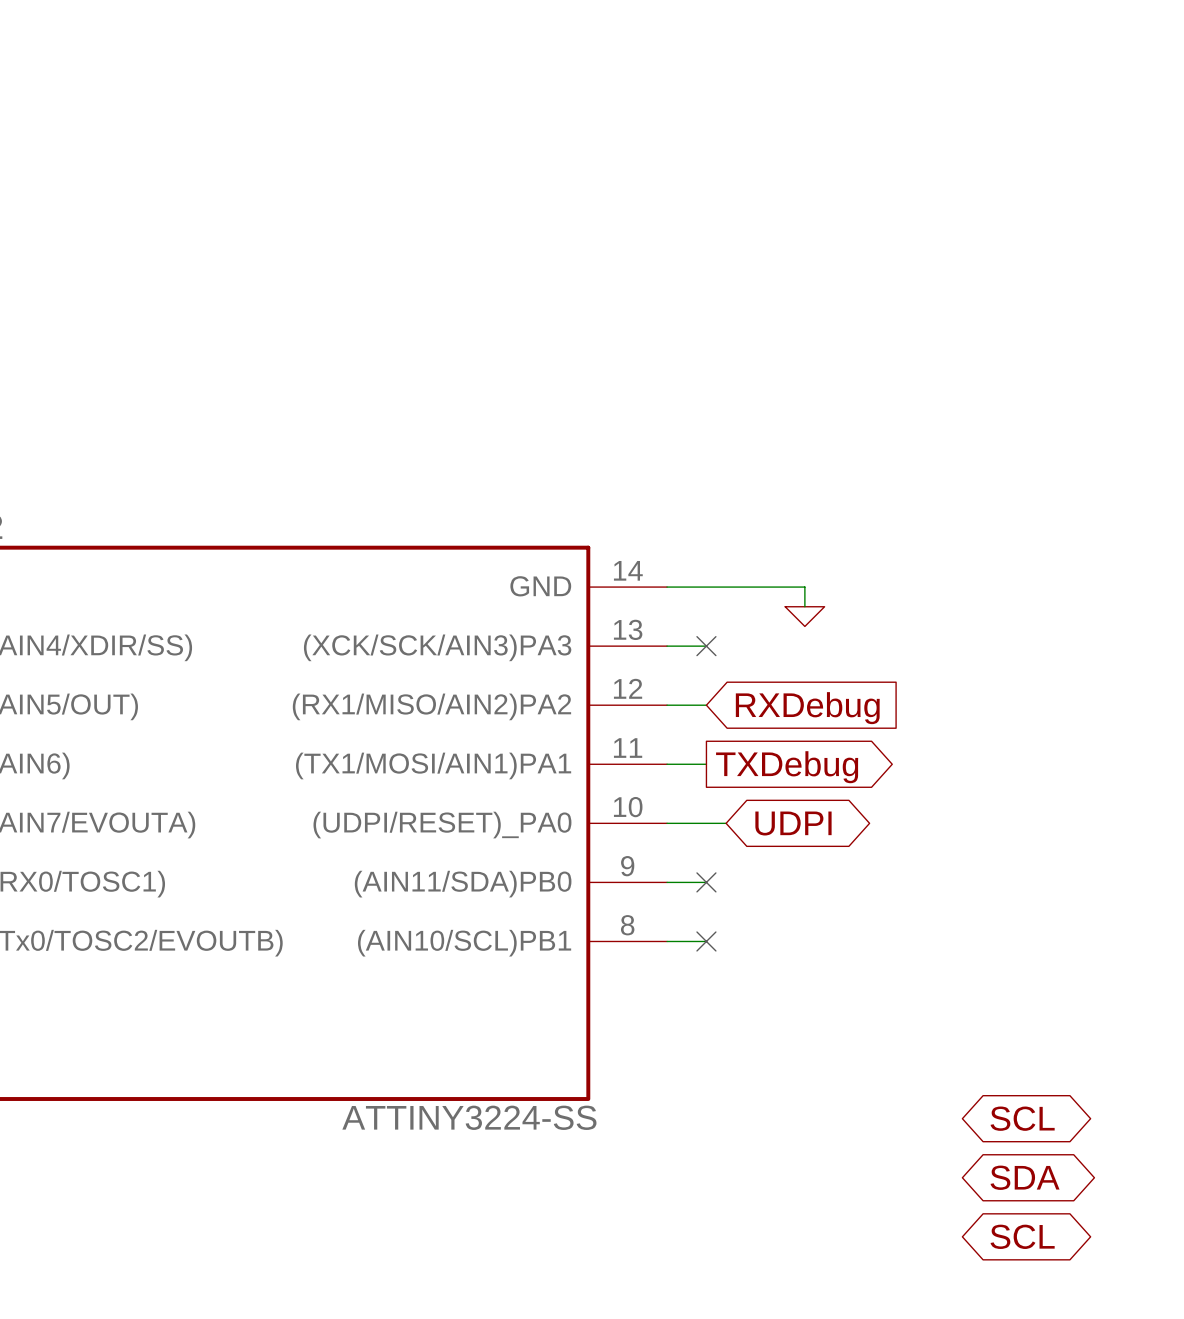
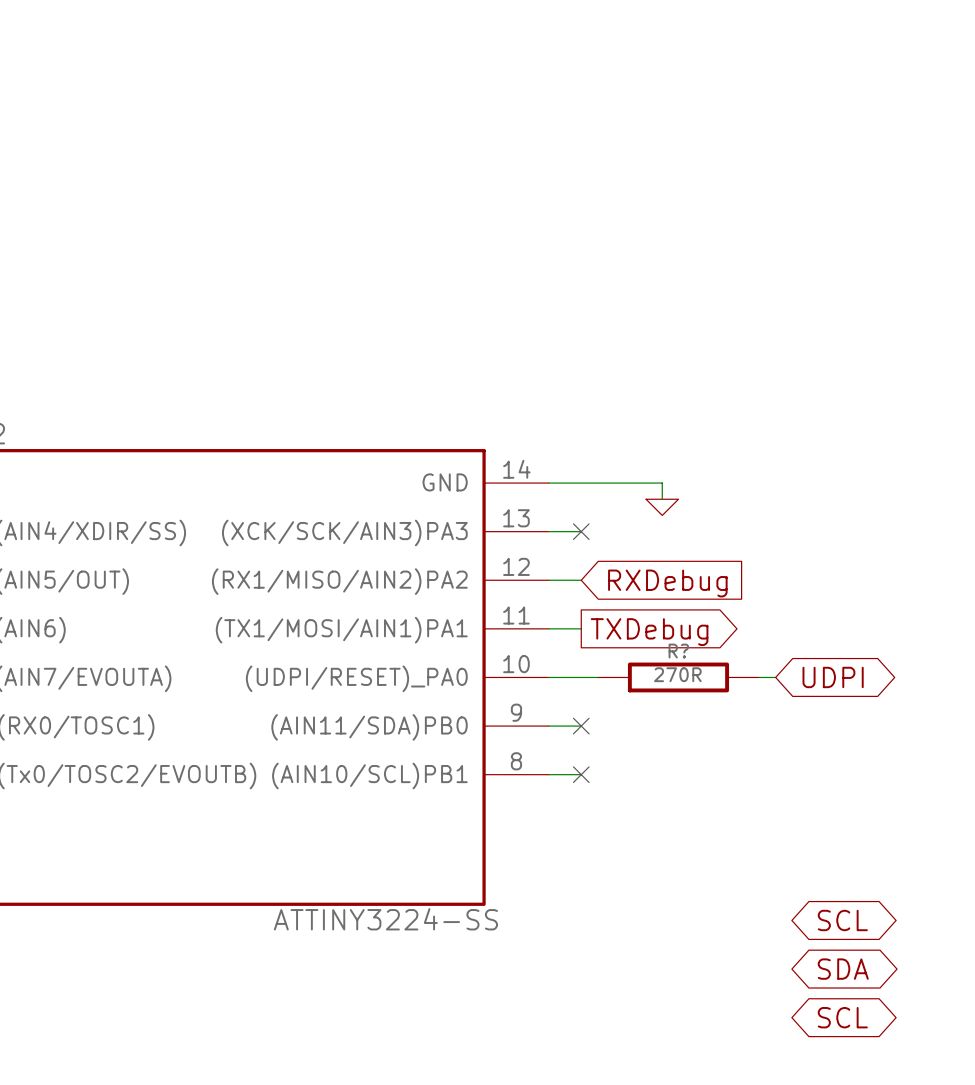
global label position: UDPI (793, 823) -> UDPI (833, 677)
R?: none -> 270R (678, 677)
wire: none -> (759, 677) (775, 677)

